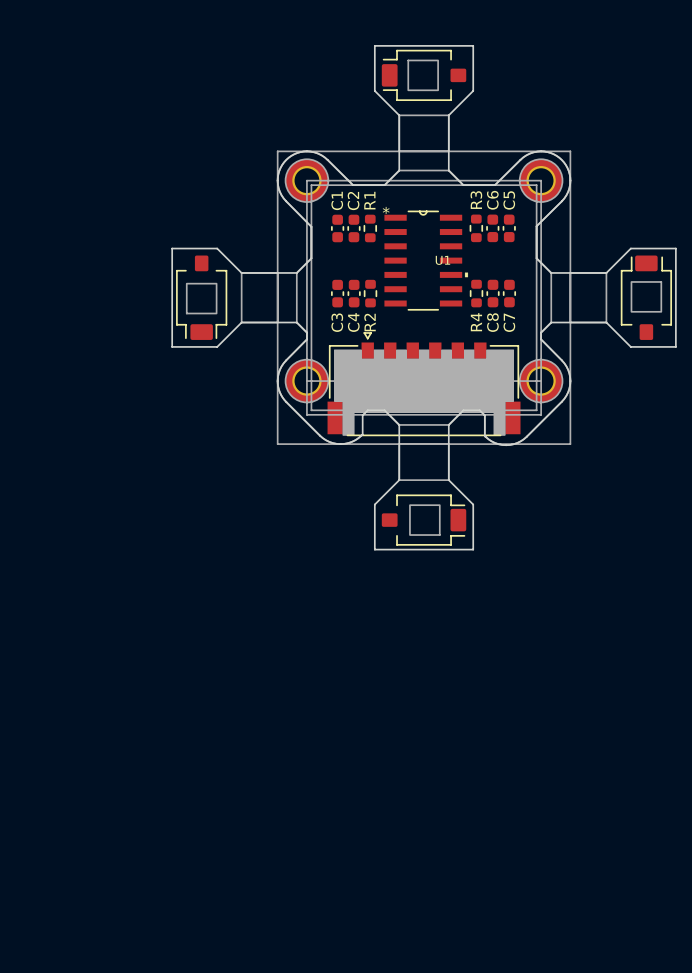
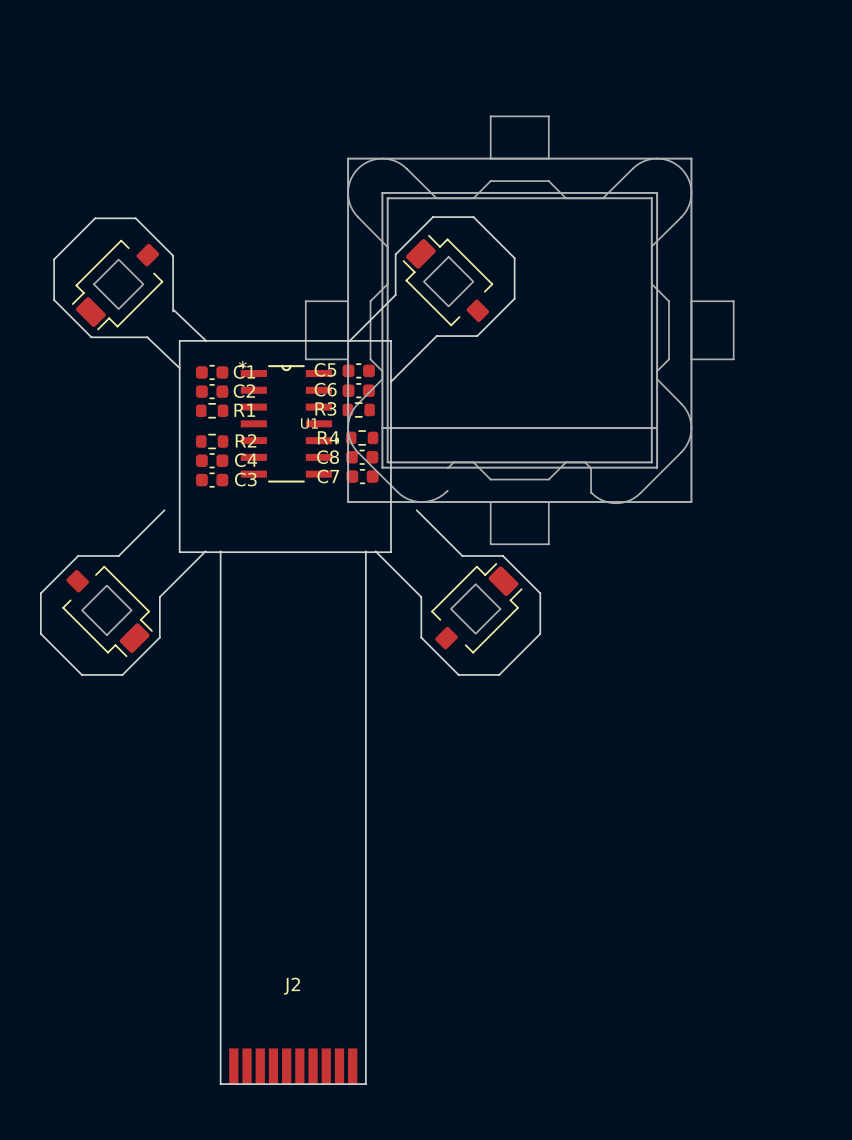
board edge: (374, 45) (374, 90) (399, 115) (399, 170) (384, 185) (353, 185) (327, 159) (318, 153) (303, 151) (288, 157) (279, 170) (278, 188) (283, 198) (311, 226) (311, 258) (296, 272) (241, 272) (217, 248) (172, 248) (172, 346) (217, 346) (241, 322) (296, 322) (306, 332) (306, 339) (283, 363) (278, 373) (278, 389) (286, 402) (319, 435) (332, 443) (349, 442) (362, 434) (362, 415) (367, 410) (384, 410) (399, 424) (399, 480) (374, 504) (374, 549) (473, 549) (473, 504) (448, 480) (448, 424) (463, 410) (479, 410) (484, 415) (484, 436) (498, 444) (513, 444) (526, 436) (561, 401) (569, 388) (569, 373) (564, 363) (541, 339) (541, 332) (551, 322) (606, 322) (630, 346) (675, 346) (675, 248) (630, 248) (606, 272) (551, 272) (536, 258) (536, 226) (561, 201) (568, 191) (570, 177) (564, 162) (550, 153) (533, 152) (523, 157) (494, 185) (463, 185) (448, 170) (448, 115) (473, 90) (473, 45) (374, 45) -> none
part: (424, 75) -> none
part: (306, 180) -> none
part: (541, 180) -> none
R3 name position: R3 (476, 200) -> R3 (325, 408)
C6 name position: C6 (492, 200) -> C6 (325, 389)
C5 name position: C5 (509, 200) -> C5 (325, 369)
C1 rotation: 0° (337, 228) -> 90° clockwise (212, 372)
C1 position: (337, 228) -> (212, 372)
C2 rotation: 0° (353, 228) -> 90° clockwise (212, 391)
C2 position: (353, 228) -> (212, 391)
R1 rotation: 0° (370, 228) -> 90° clockwise (212, 410)
R1 position: (370, 228) -> (212, 410)
R3 rotation: 0° (476, 228) -> 90° clockwise (358, 409)
R3 position: (476, 228) -> (358, 409)
C6 rotation: 0° (492, 228) -> 90° clockwise (358, 390)
C6 position: (492, 228) -> (358, 390)
C5 rotation: 0° (509, 228) -> 90° clockwise (358, 370)
C5 position: (509, 228) -> (358, 370)
part: none -> (447, 280)
part: none -> (117, 285)
U1 position: (426, 260) -> (289, 423)
board edge: none -> (173, 310) (206, 340)
board edge: none -> (173, 311) (173, 255) (135, 218) (95, 218) (54, 259) (54, 299) (91, 337) (147, 337) (179, 367)
C3 rotation: 0° (337, 293) -> 90° clockwise (212, 480)
C3 position: (337, 293) -> (212, 480)
C4 rotation: 0° (354, 293) -> 90° clockwise (212, 460)
C4 position: (354, 293) -> (212, 460)
R2 rotation: 0° (370, 293) -> 90° clockwise (212, 441)
R2 position: (370, 293) -> (212, 441)
R4 rotation: 0° (476, 293) -> 90° clockwise (362, 437)
R4 position: (476, 293) -> (362, 437)
C8 rotation: 0° (493, 293) -> 90° clockwise (362, 457)
C8 position: (493, 293) -> (362, 457)
C7 rotation: 0° (509, 293) -> 90° clockwise (362, 476)
C7 position: (509, 293) -> (362, 476)
part: (201, 297) -> none
part: (646, 297) -> none
board edge: none -> (179, 340) (390, 340) (390, 552) (179, 552) (179, 340)
board edge: none -> (349, 340) (395, 294) (395, 254) (433, 217) (473, 217) (514, 258) (514, 298) (477, 336) (436, 336) (390, 381)
C3 name position: C3 (337, 322) -> C3 (245, 479)
C4 name position: C4 (353, 322) -> C4 (246, 460)
R2 name position: R2 (370, 322) -> R2 (246, 440)
part: (306, 381) -> none
part: (541, 381) -> none
part: (424, 384) -> none
board edge: none -> (164, 510) (118, 555) (78, 555) (40, 593) (40, 633) (81, 674) (122, 674) (159, 637) (159, 597) (205, 551)
board edge: none -> (416, 510) (462, 555) (502, 555) (540, 593) (540, 633) (499, 674) (458, 674) (421, 637) (421, 597) (375, 551)
board edge: none -> (220, 551) (220, 1084) (365, 1084) (365, 551)
part: (424, 520) -> none
part: none -> (476, 608)
part: none -> (107, 611)
J2: none -> (293, 1066)

